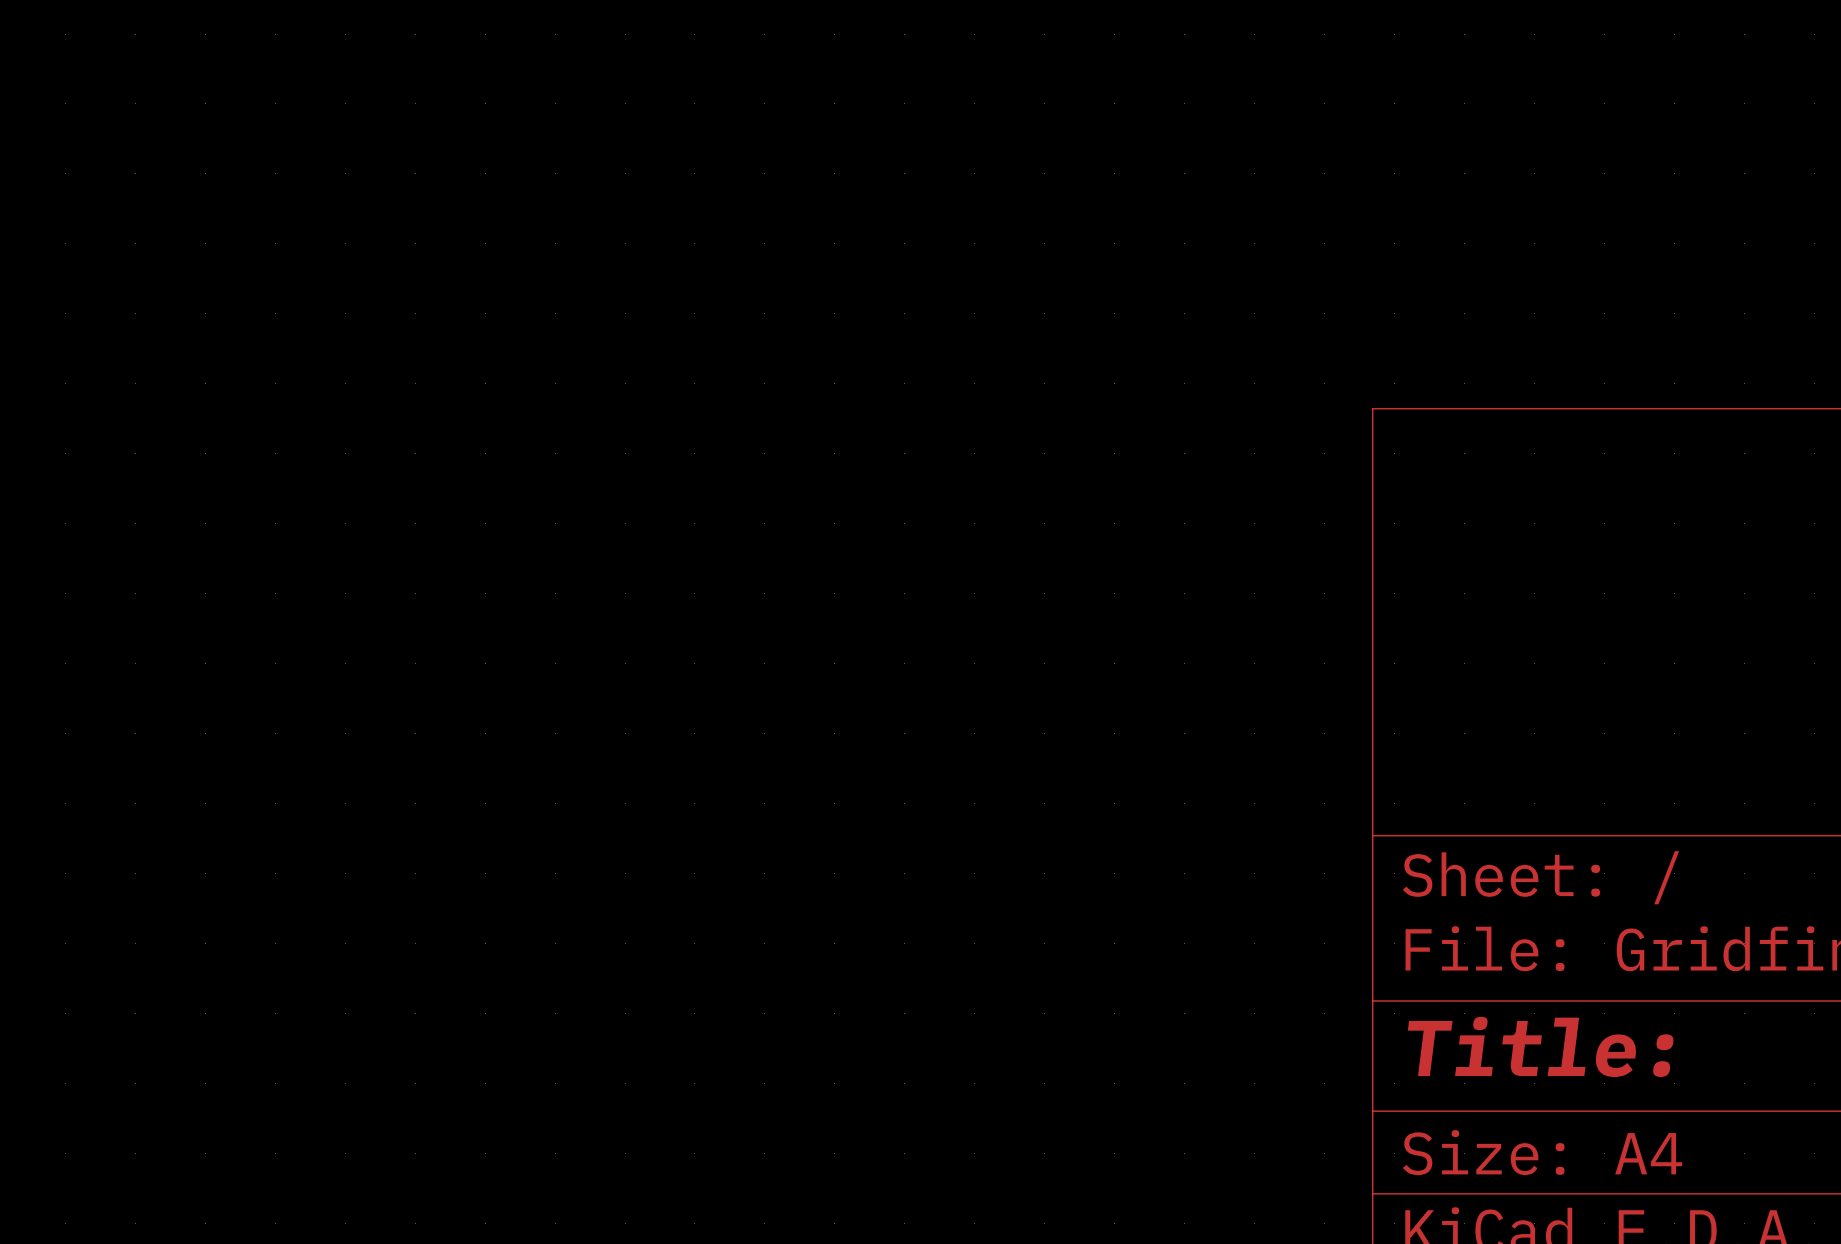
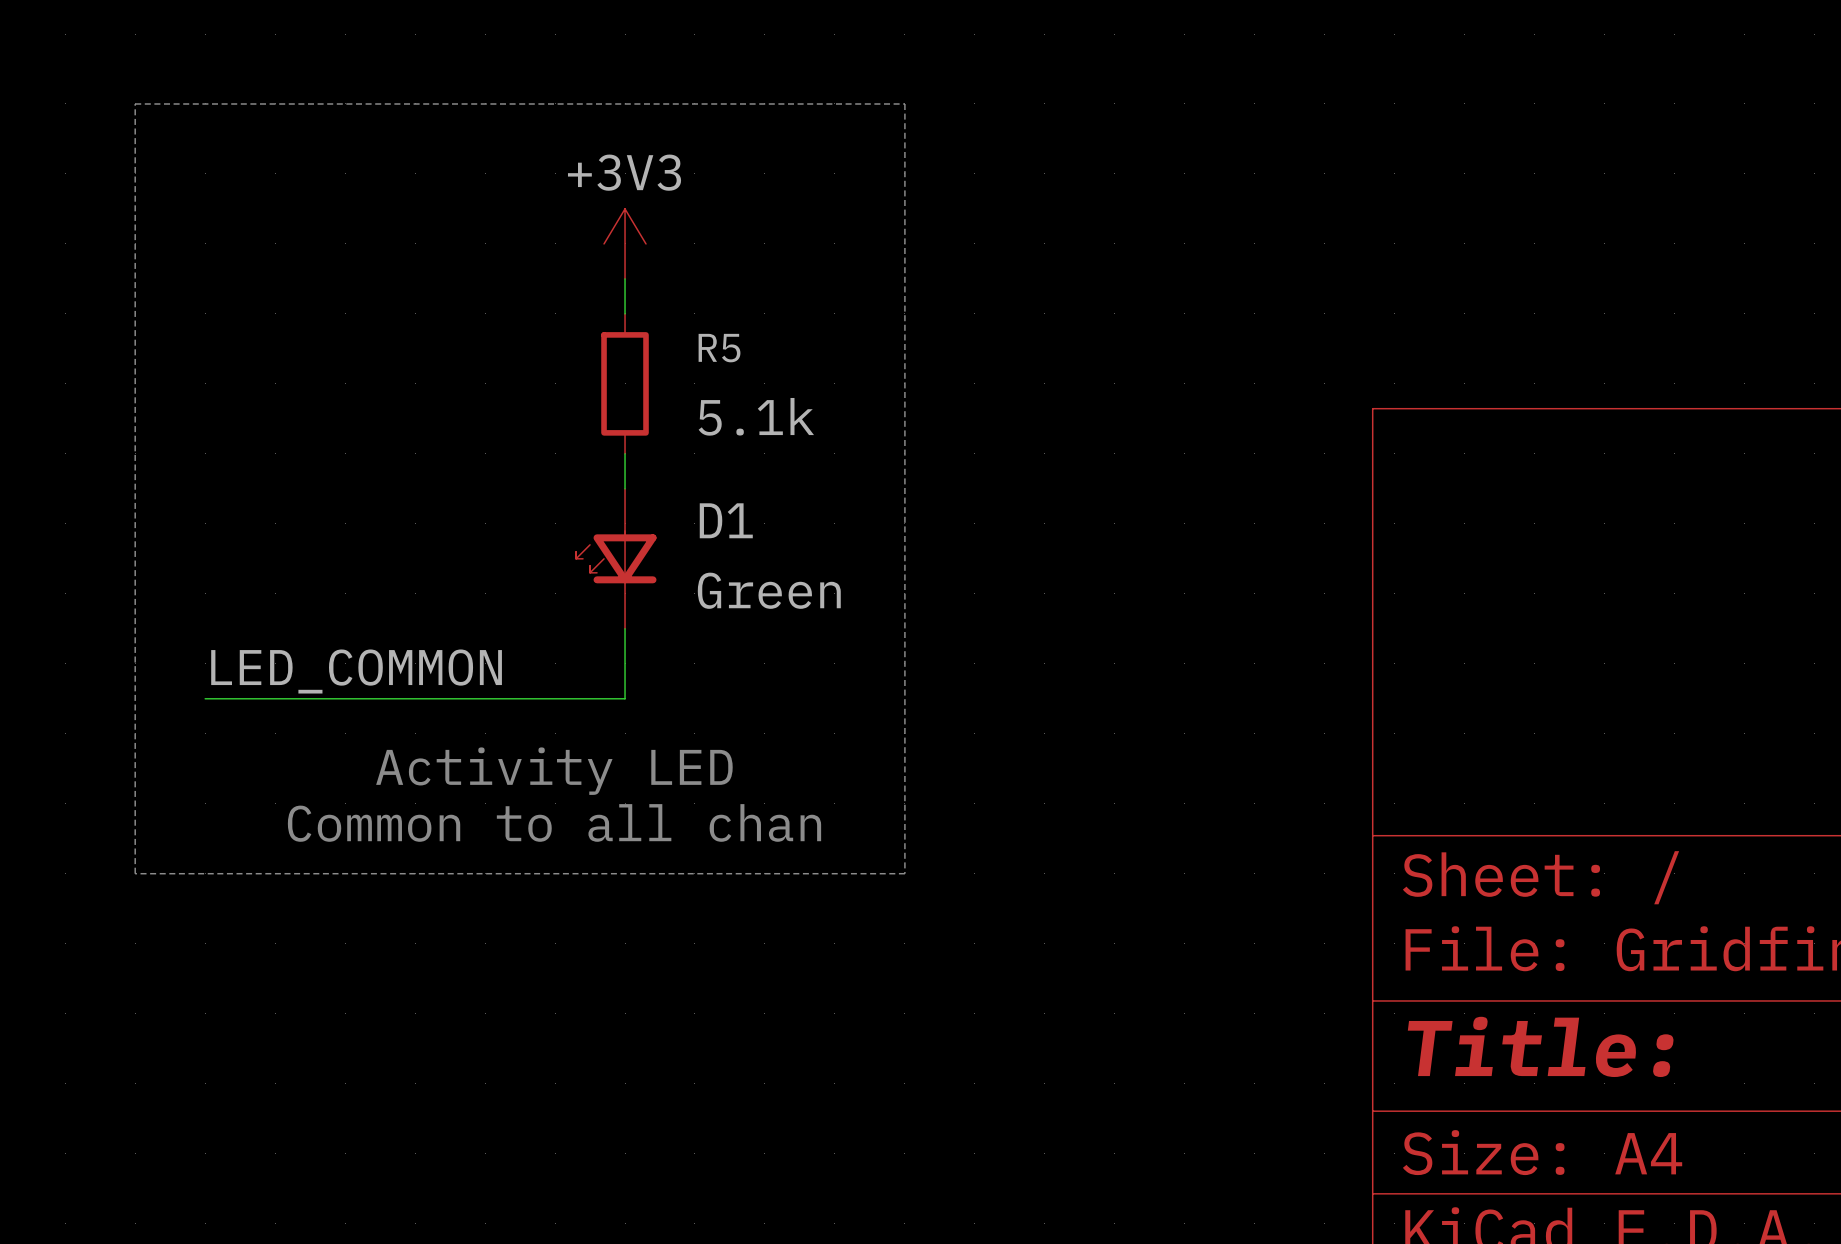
line: none -> (135, 103) (904, 103) (904, 873) (135, 873) (135, 103)
power symbol: none -> +3V3 (625, 243)
wire: none -> (625, 278) (625, 313)
R5: none -> 5.1k (625, 383)
wire: none -> (625, 453) (625, 488)
D1: none -> Green (616, 558)
wire: none -> (625, 628) (625, 698) (205, 698)
label: none -> LED_COMMON (356, 671)
text: none -> Activity LED (554, 771)
text: none -> Common to all chan (554, 822)

